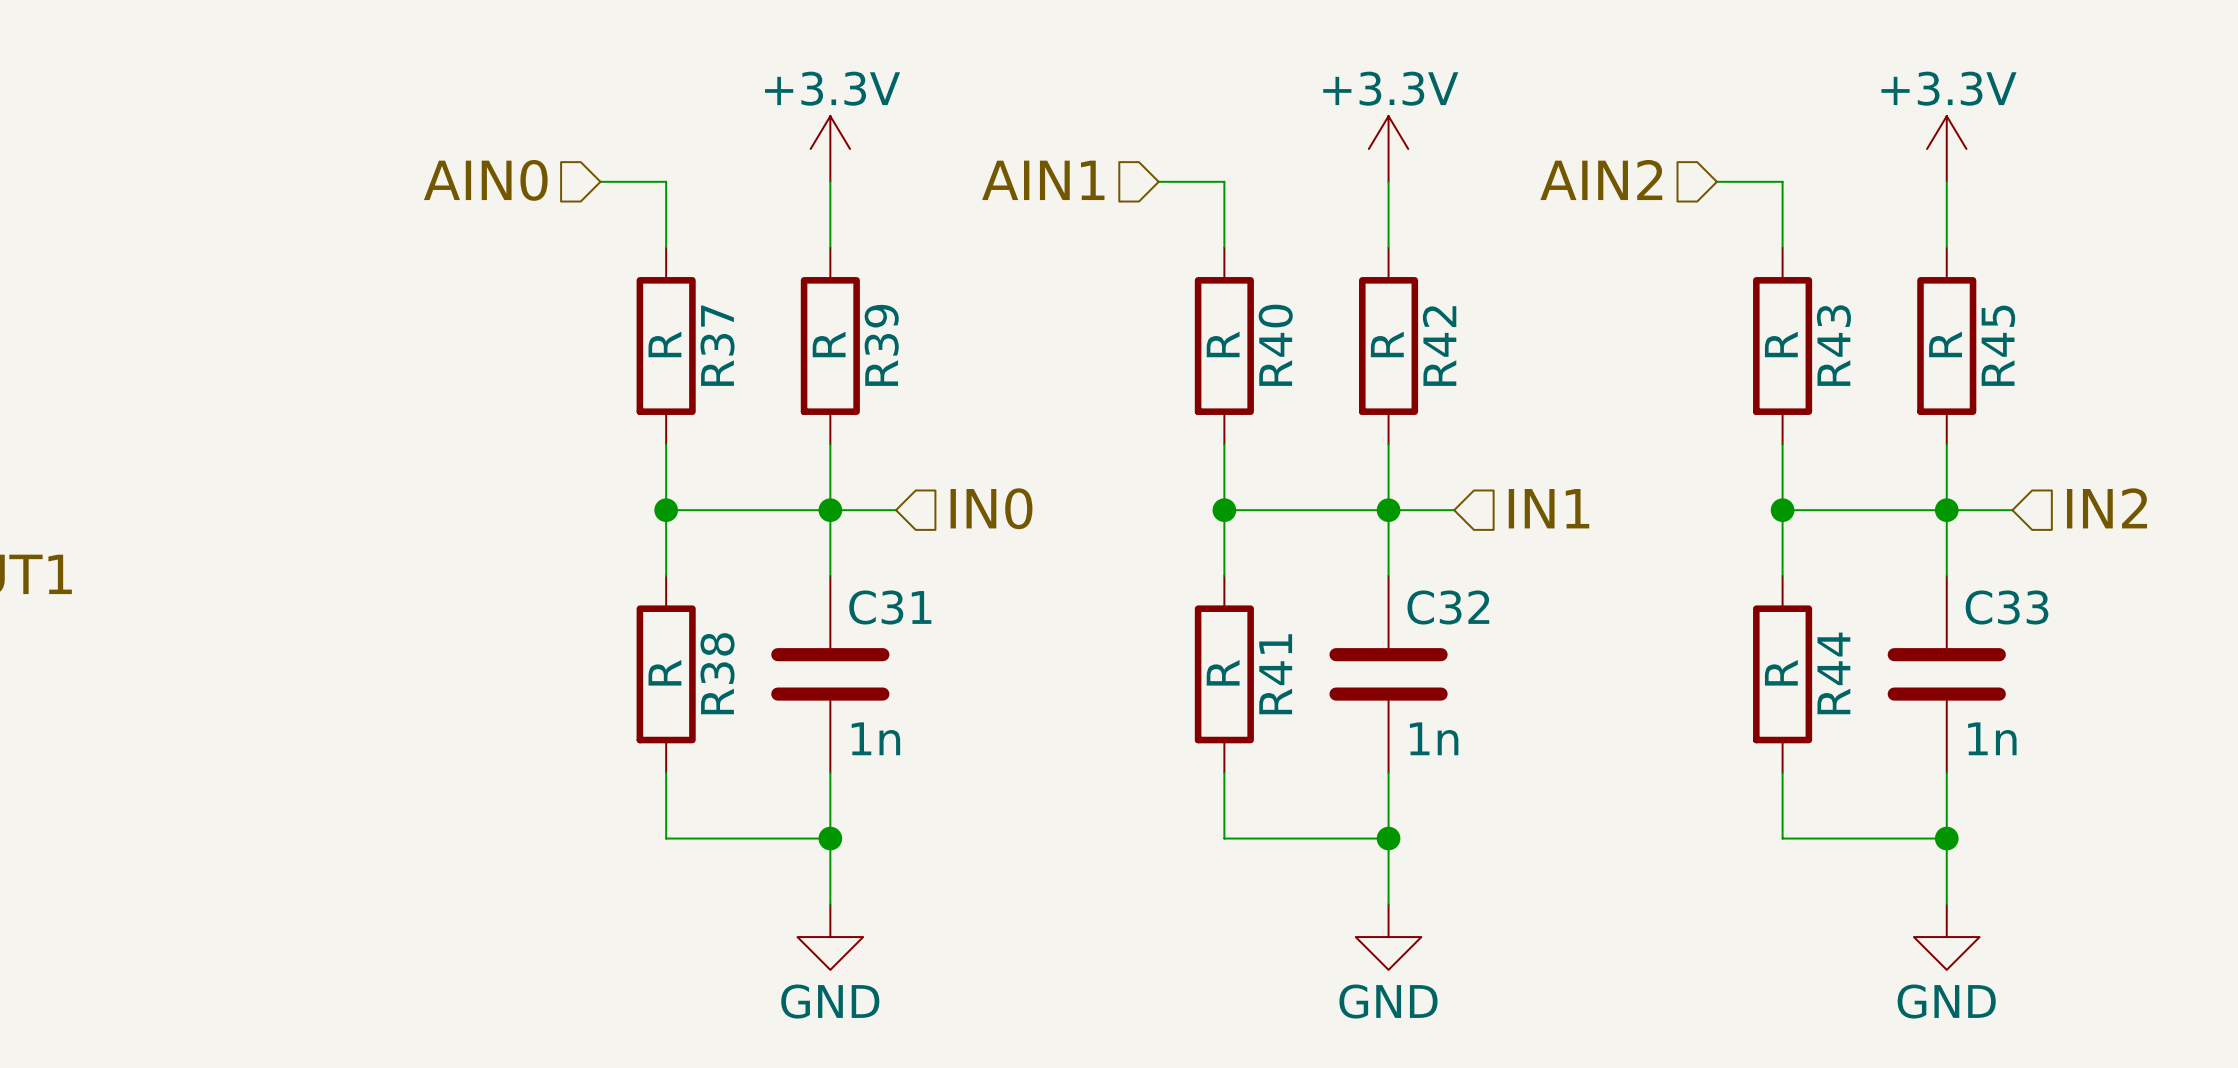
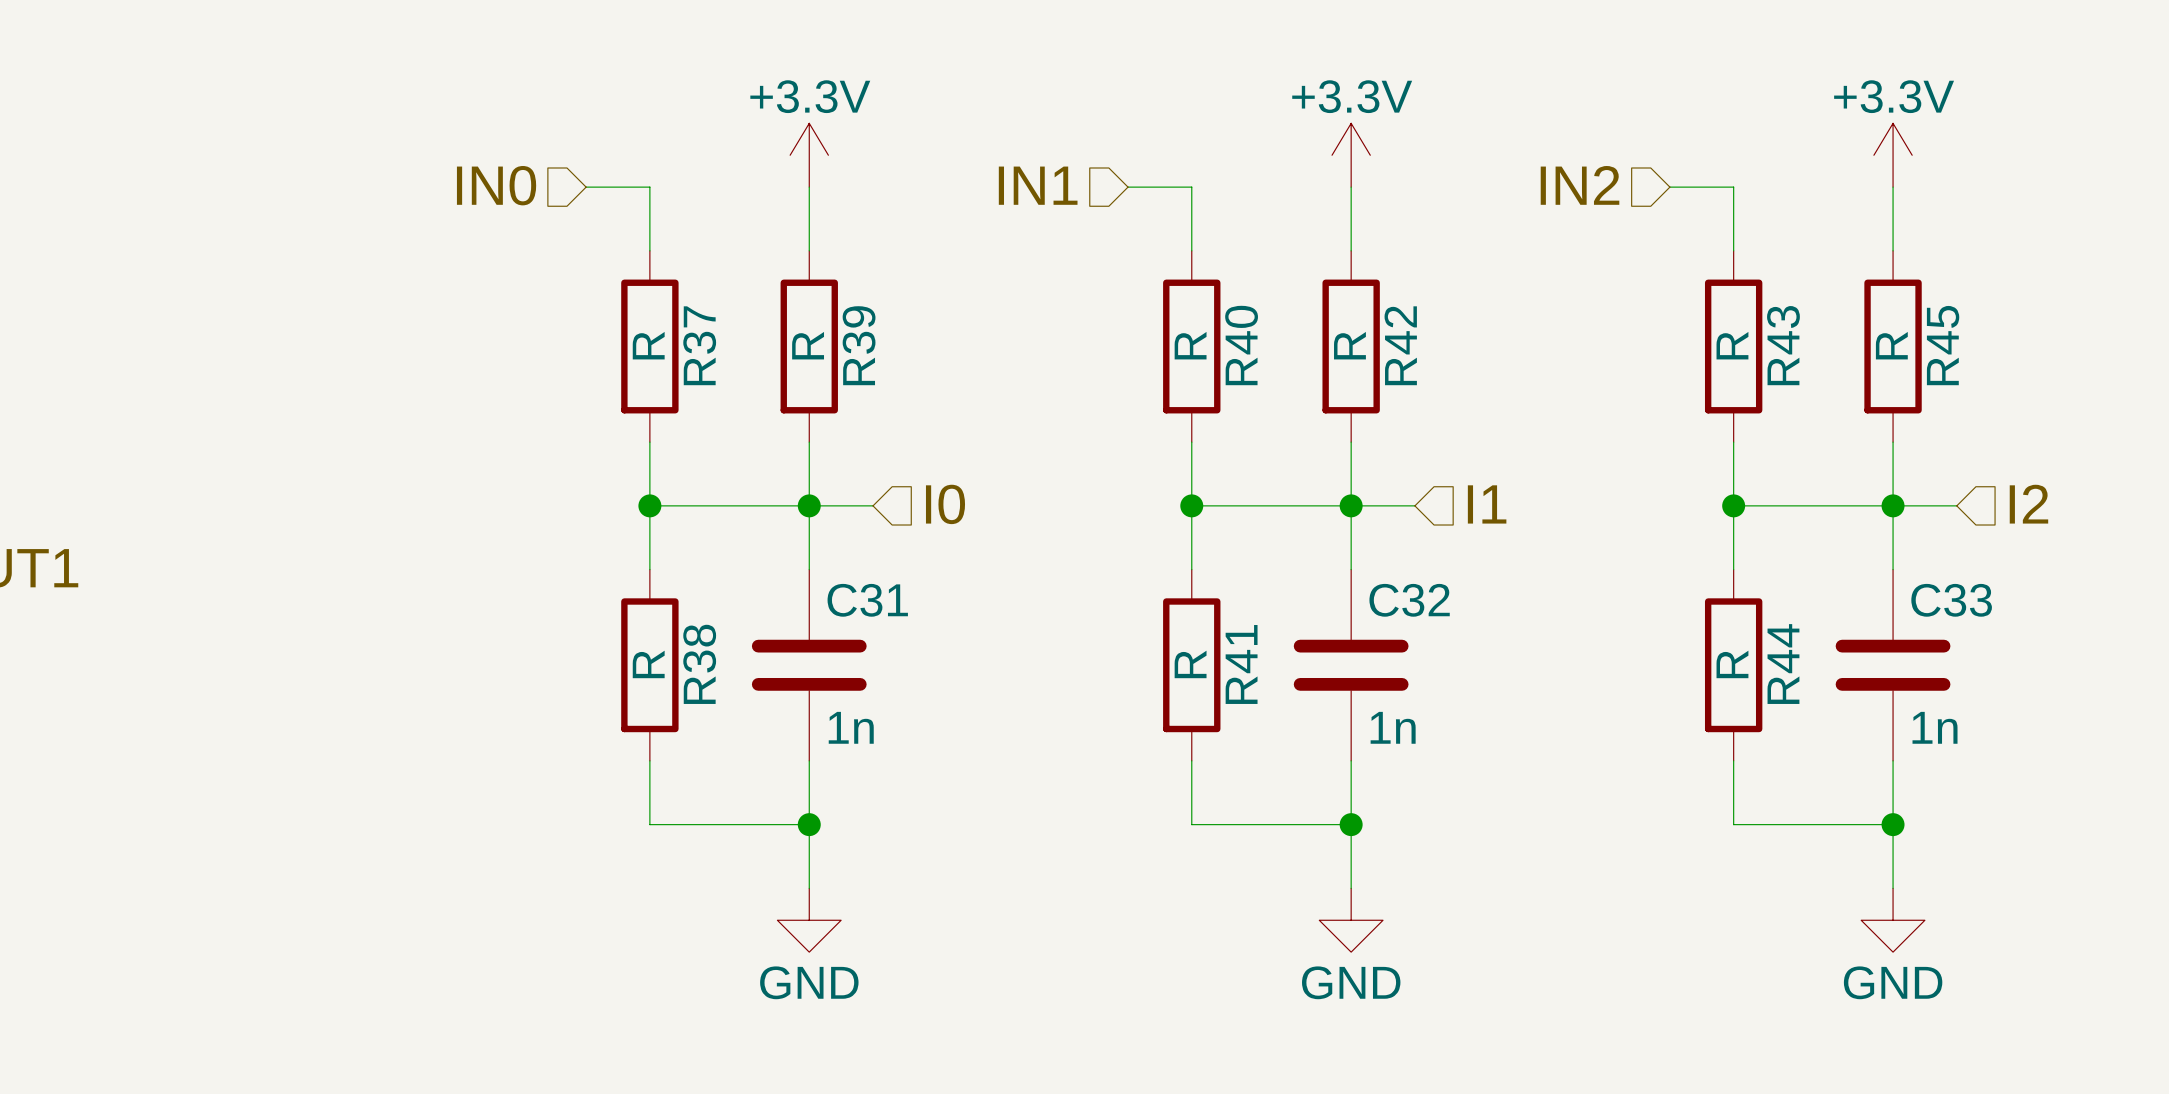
hierarchical label: AIN0 (485, 180) -> IN0 (496, 185)
hierarchical label: AIN1 (1043, 180) -> IN1 (1038, 185)
hierarchical label: AIN2 (1601, 180) -> IN2 (1580, 185)
hierarchical label: IN0 (991, 508) -> I0 (945, 504)
hierarchical label: IN1 (1549, 508) -> I1 (1487, 504)
hierarchical label: IN2 (2107, 508) -> I2 (2028, 504)

